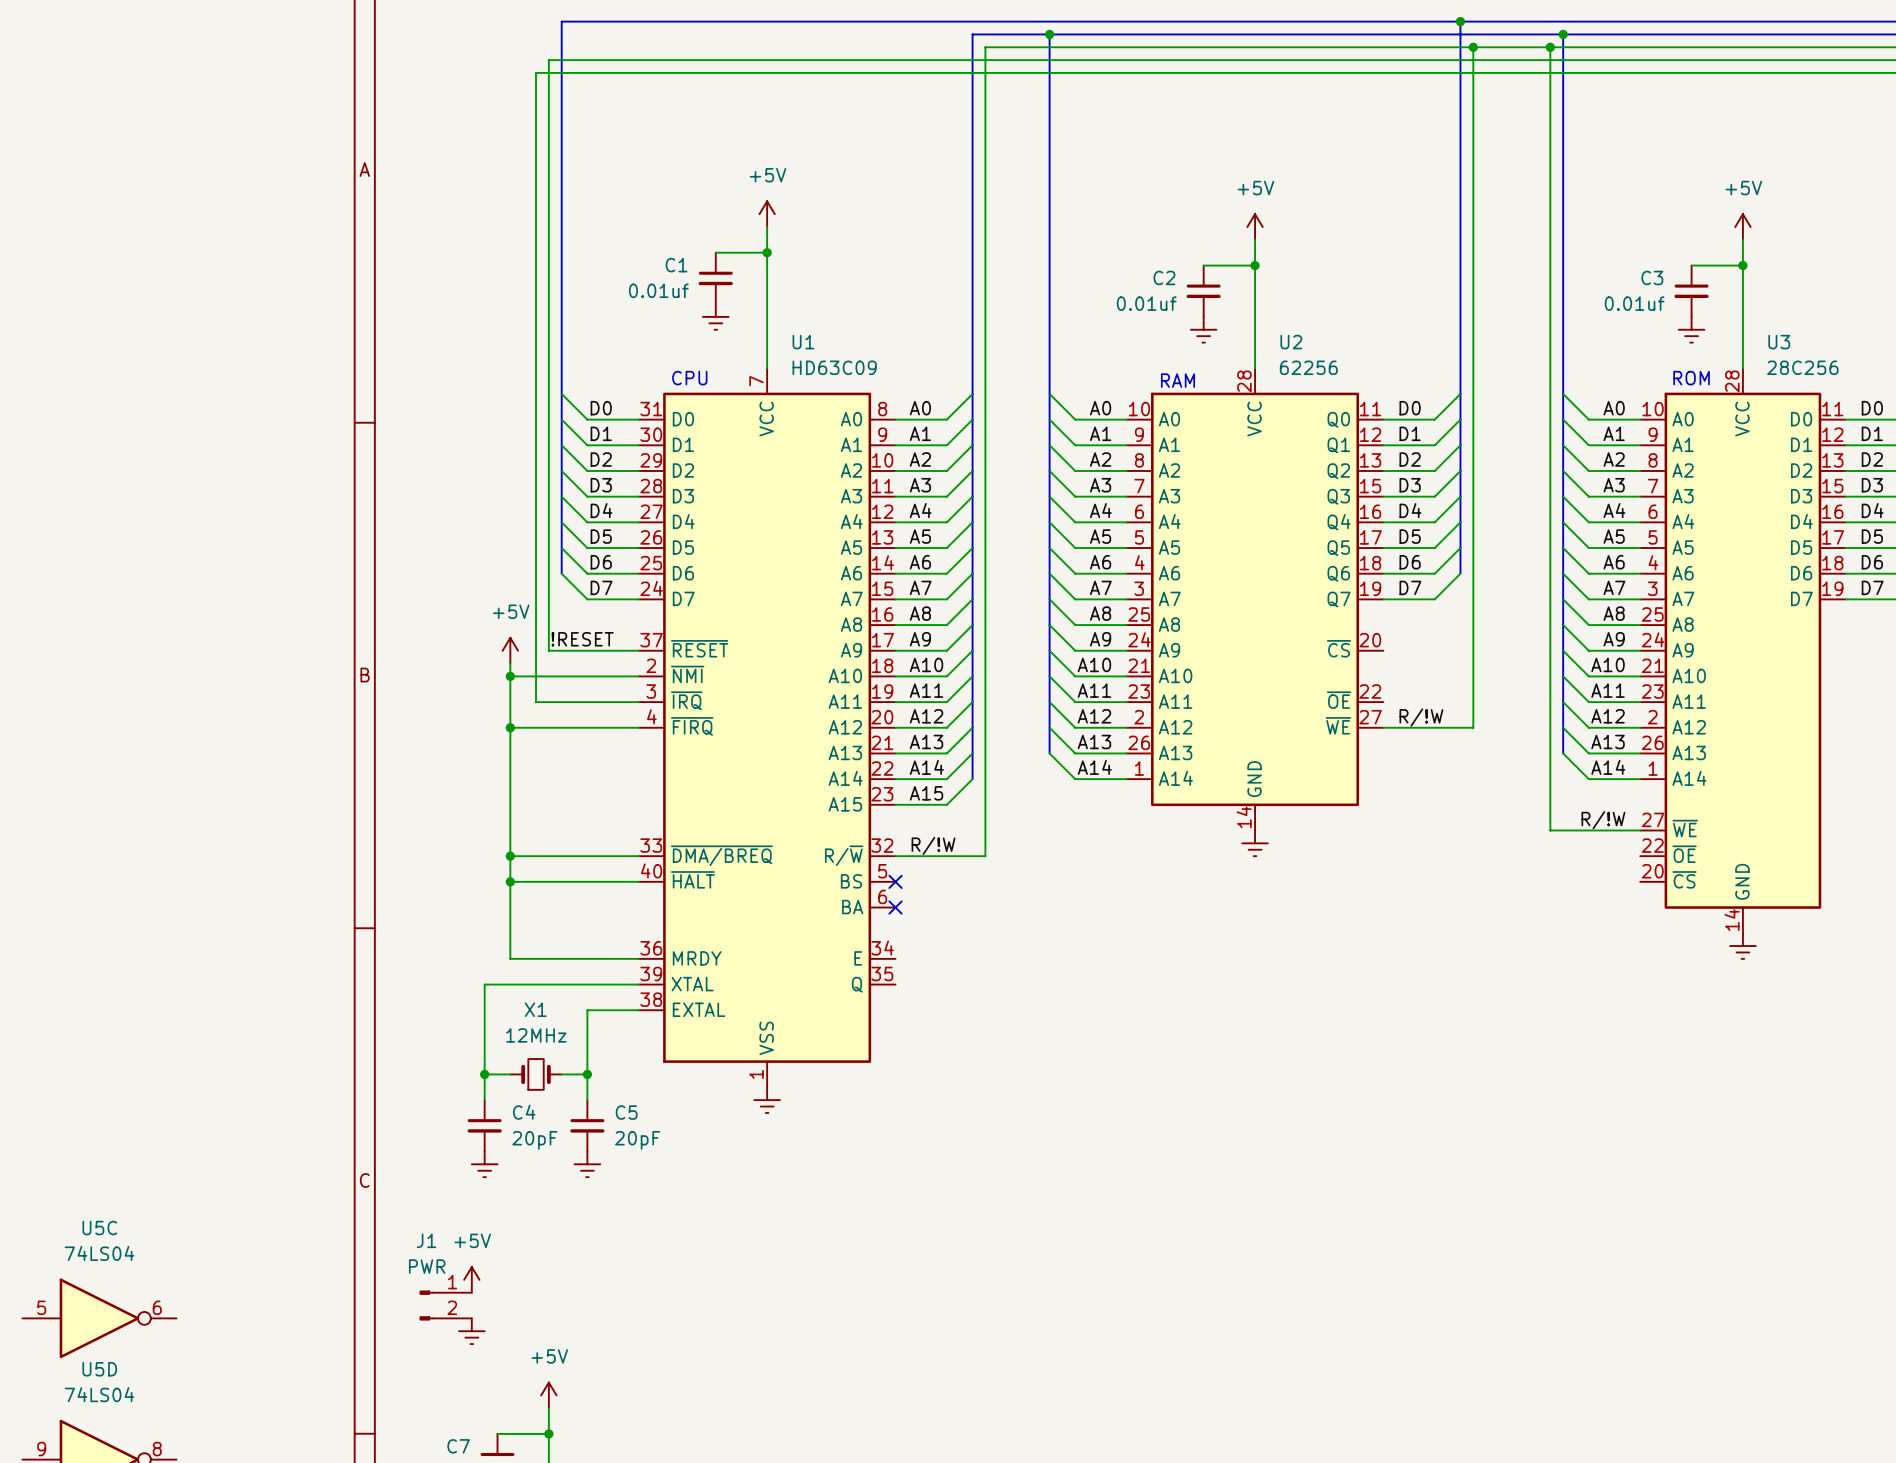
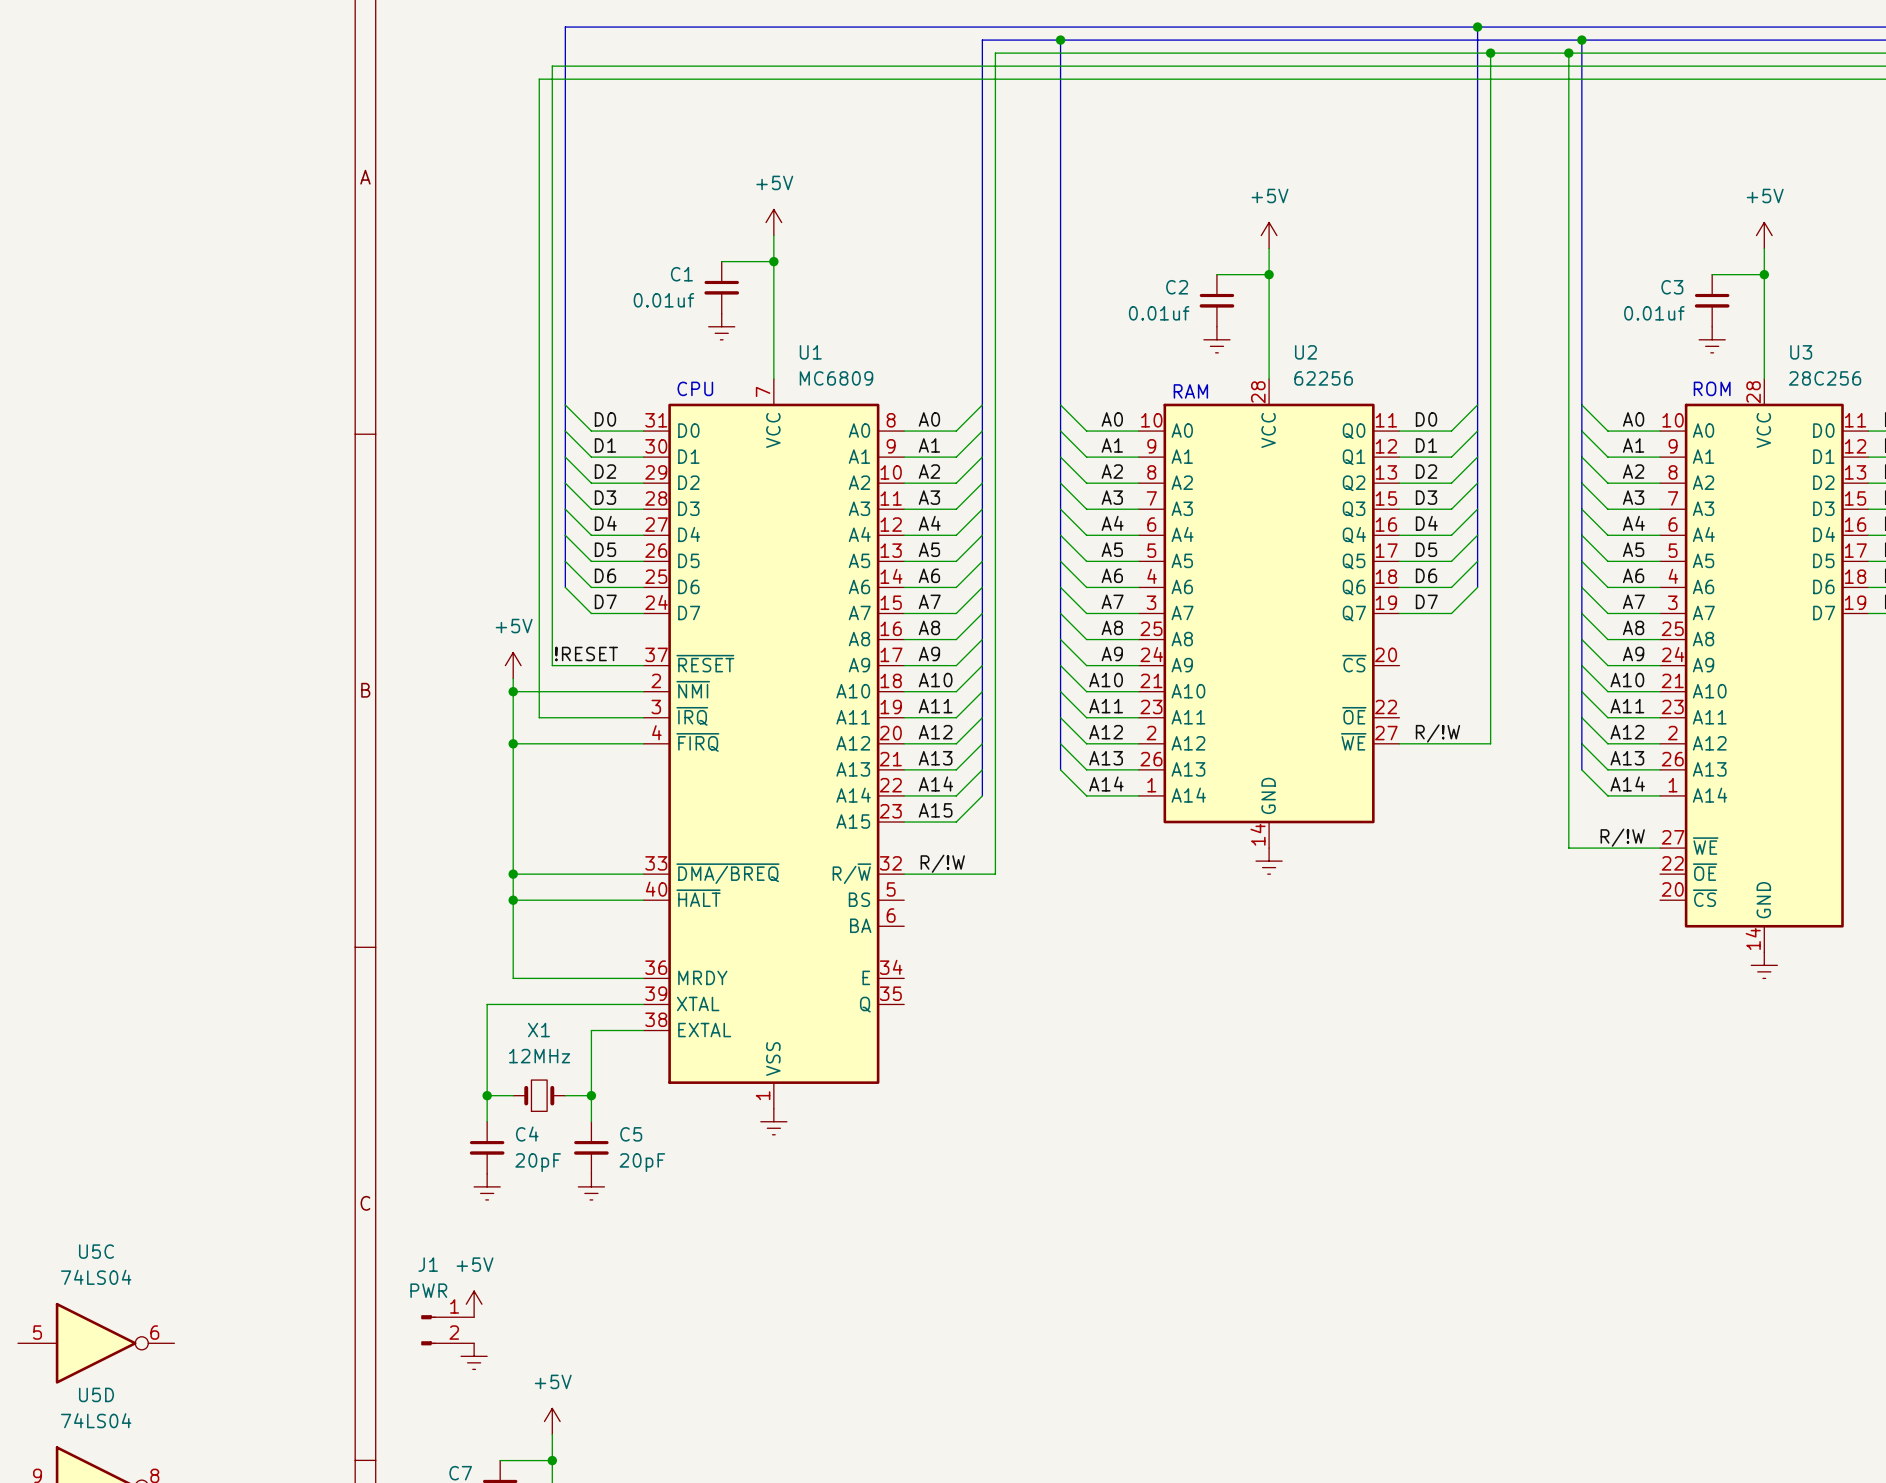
U1 value: HD63C09 (834, 367) -> MC6809 (836, 378)
no-connect mark: (895, 881) -> none
no-connect mark: (895, 907) -> none

